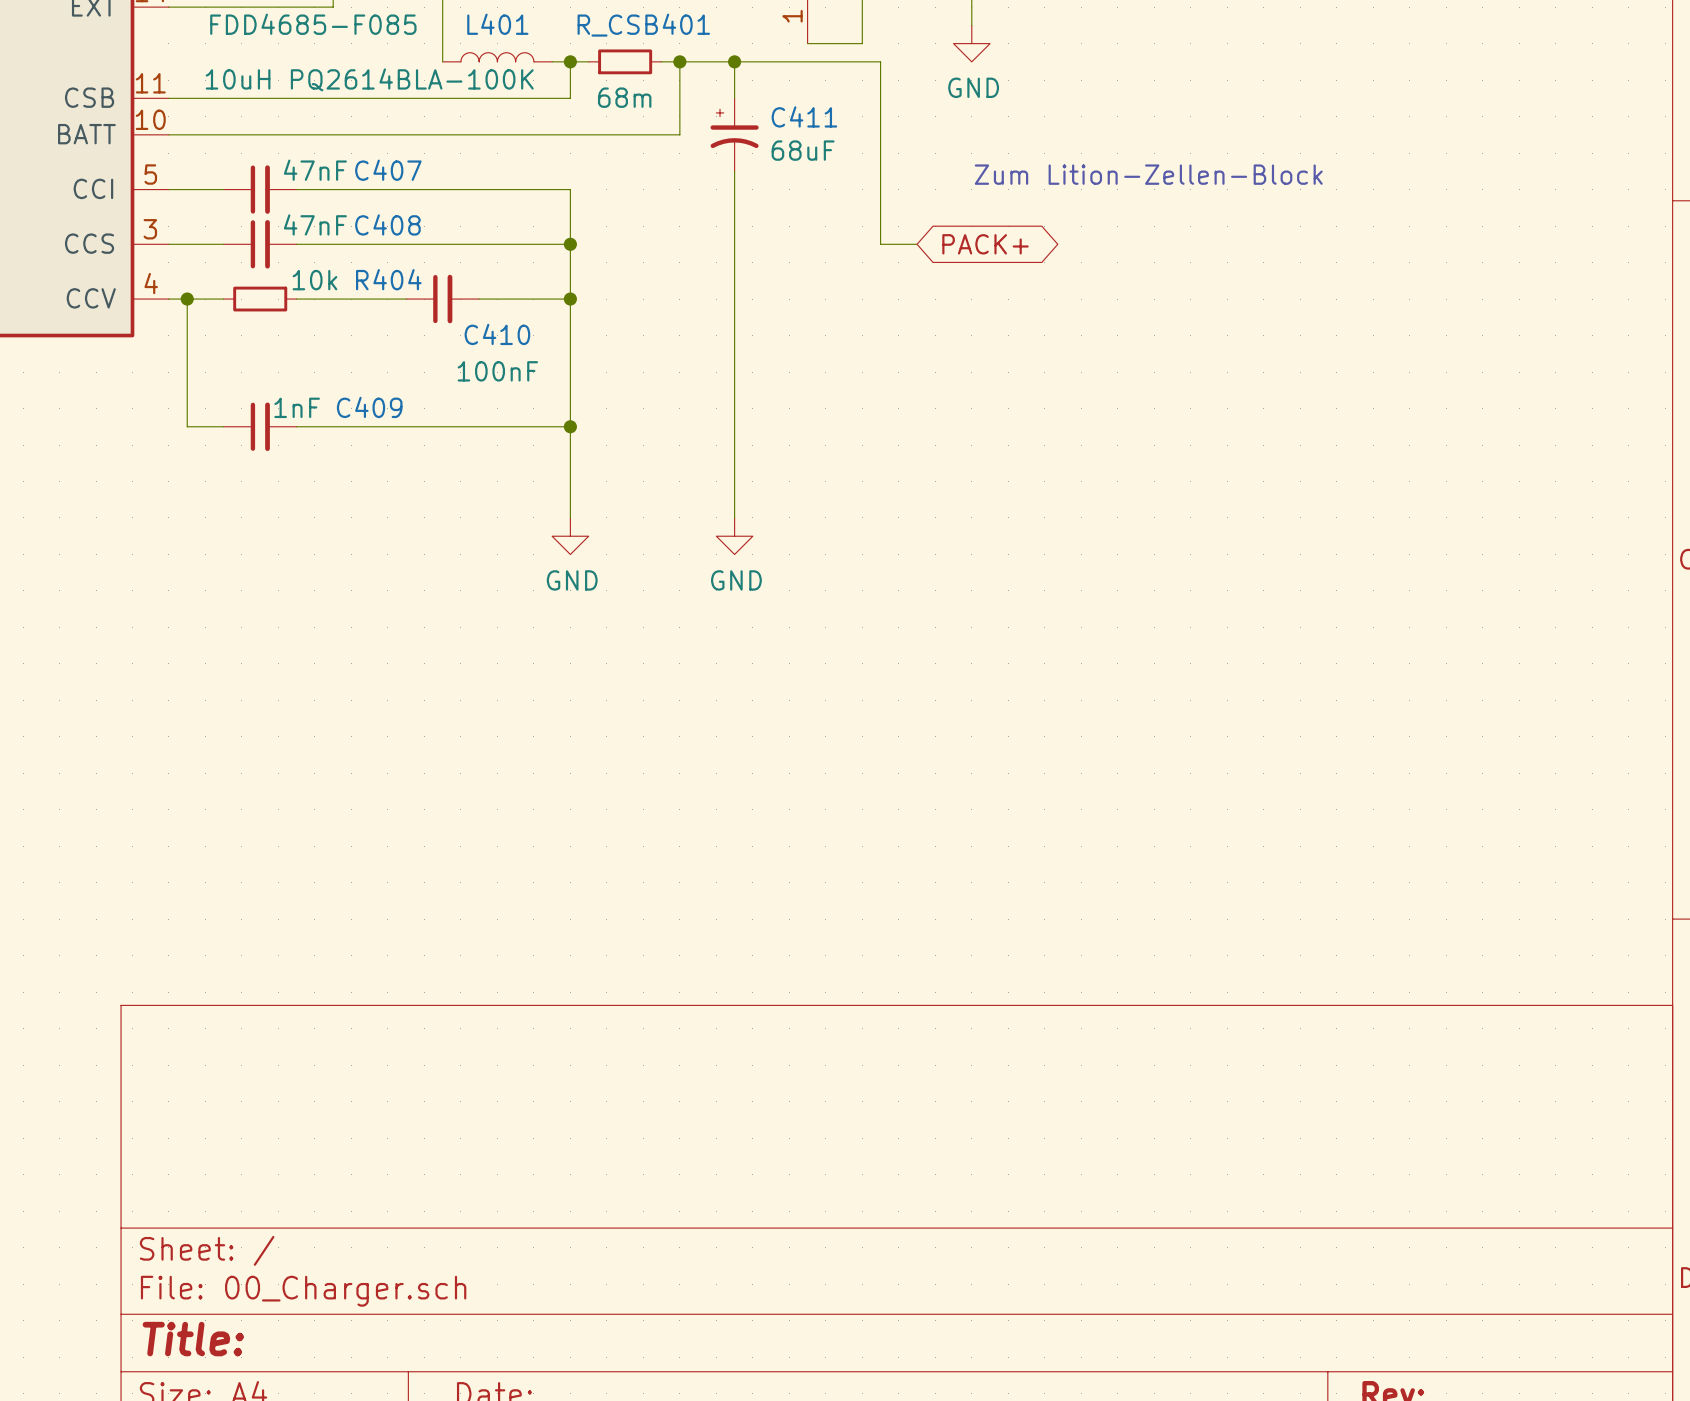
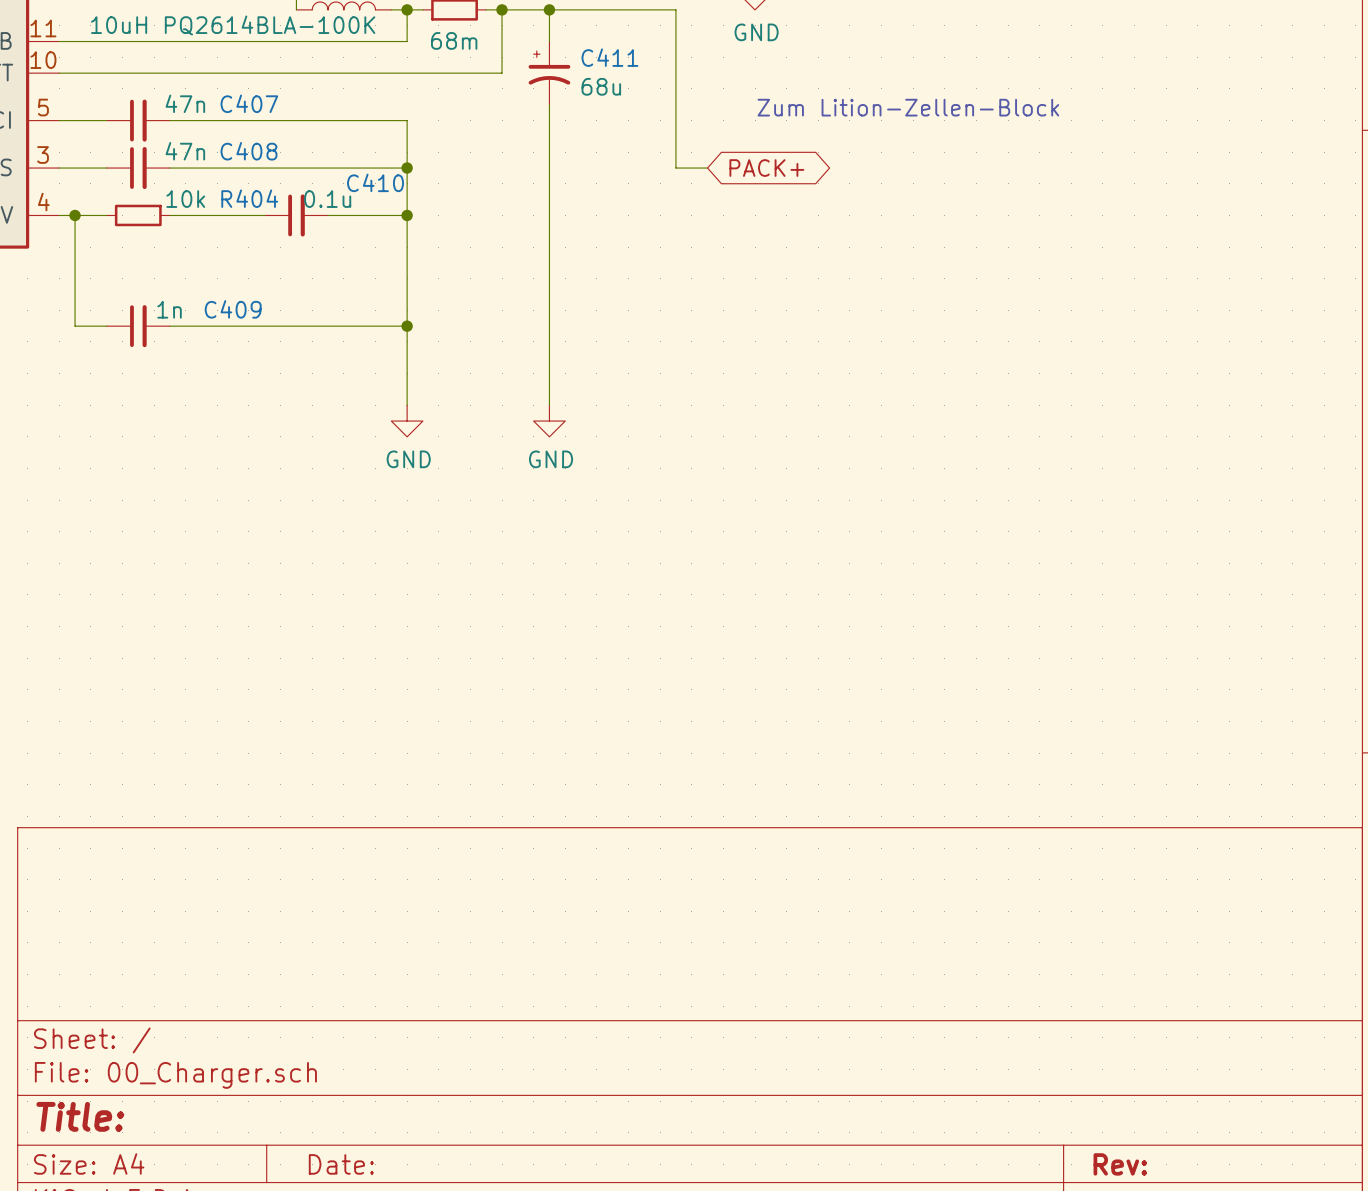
C411 value: 68uF (803, 150) -> 68u (601, 86)
C407 value: 47nF (315, 170) -> 47n (185, 103)
C408 value: 47nF (315, 224) -> 47n (185, 151)
C410 name position: C410 (497, 334) -> C410 (375, 182)
C410 value: 100nF (497, 371) -> 0.1u (327, 199)
C409 value: 1nF (297, 407) -> 1n (169, 309)

